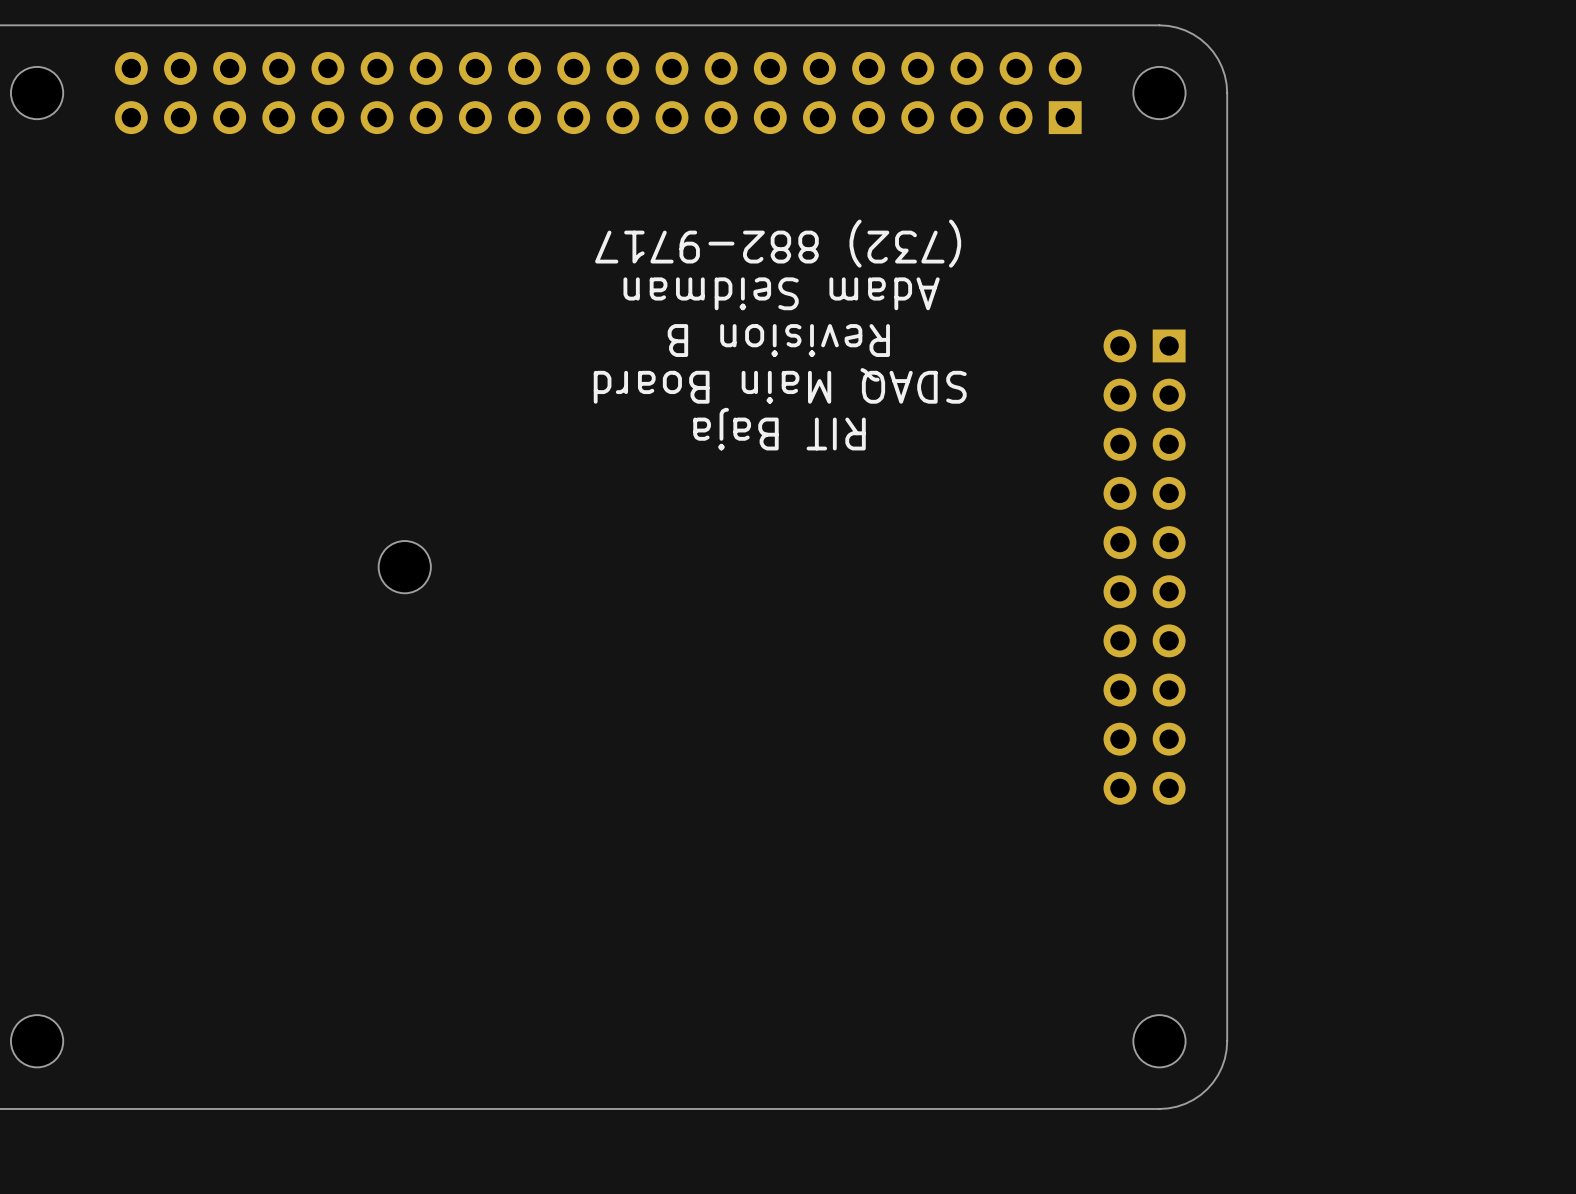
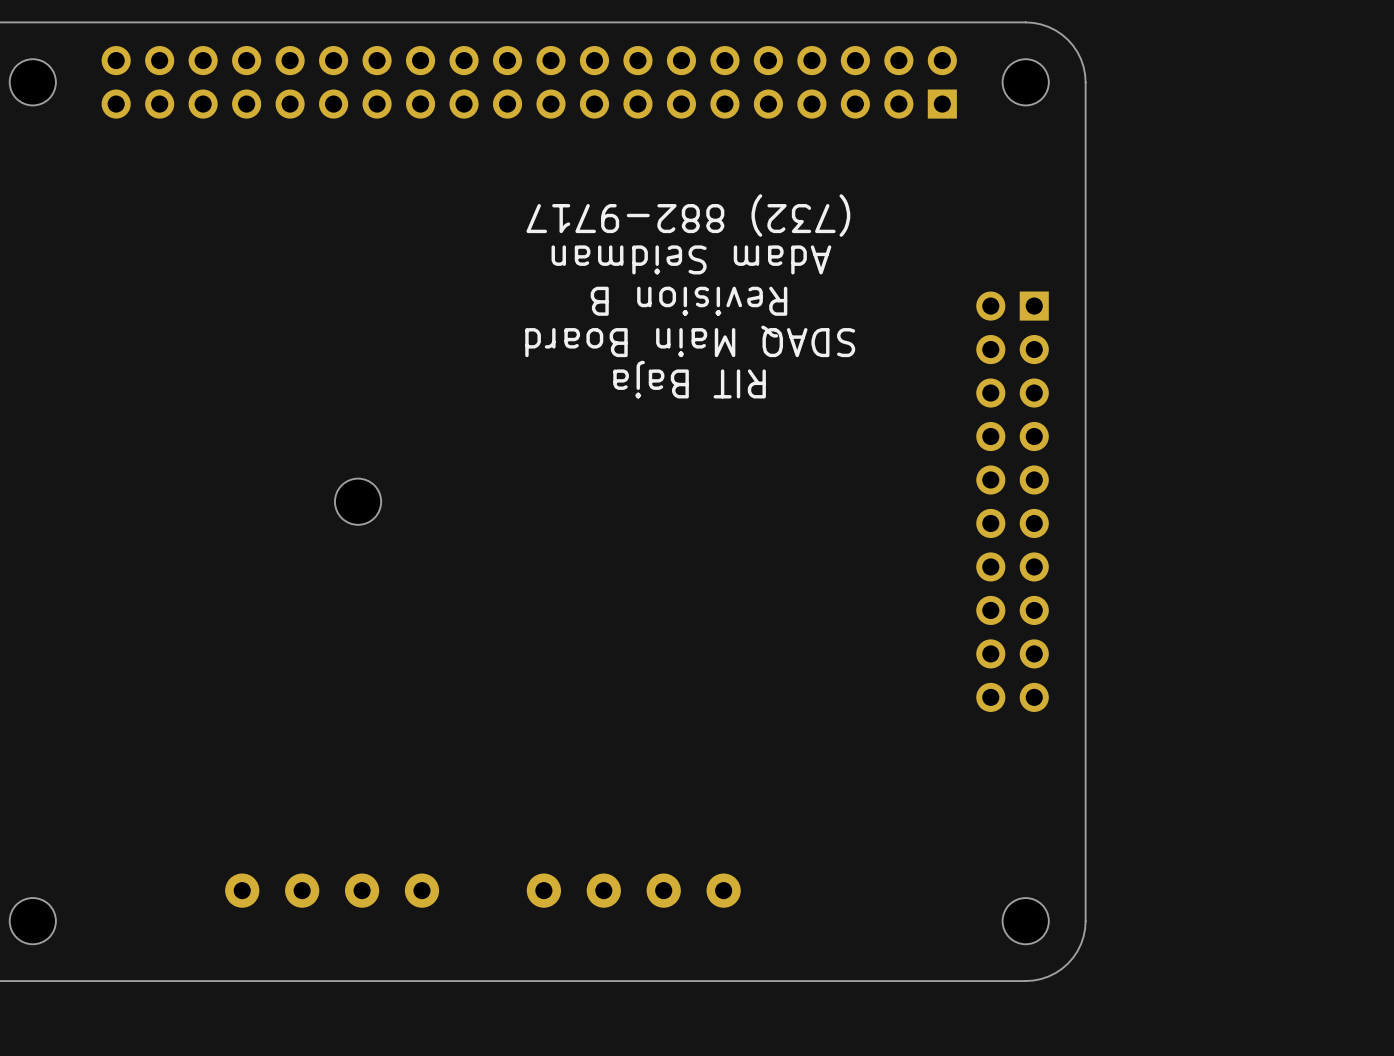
part: none -> (332, 890)
part: none -> (633, 890)

